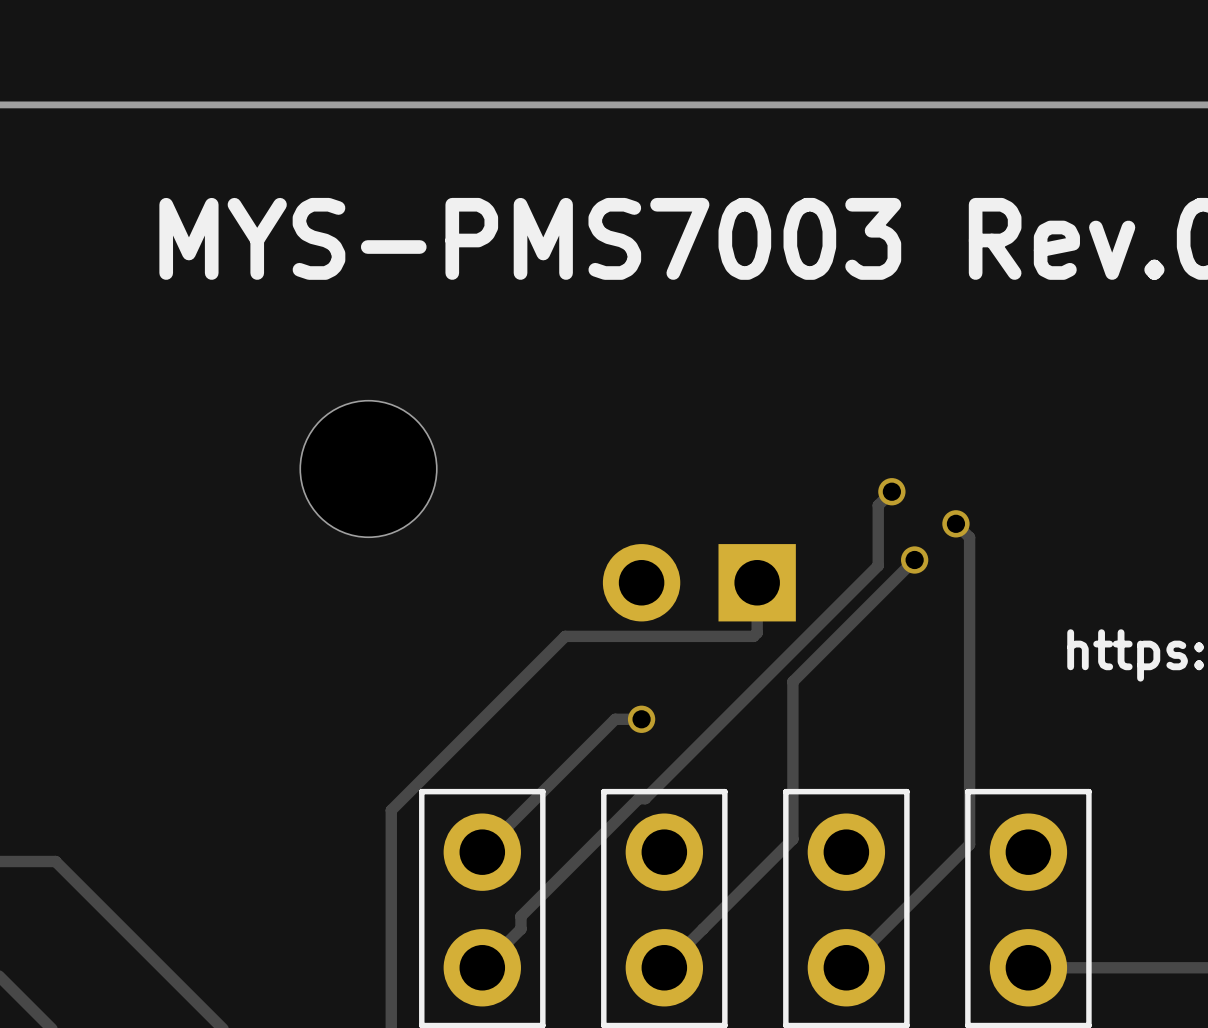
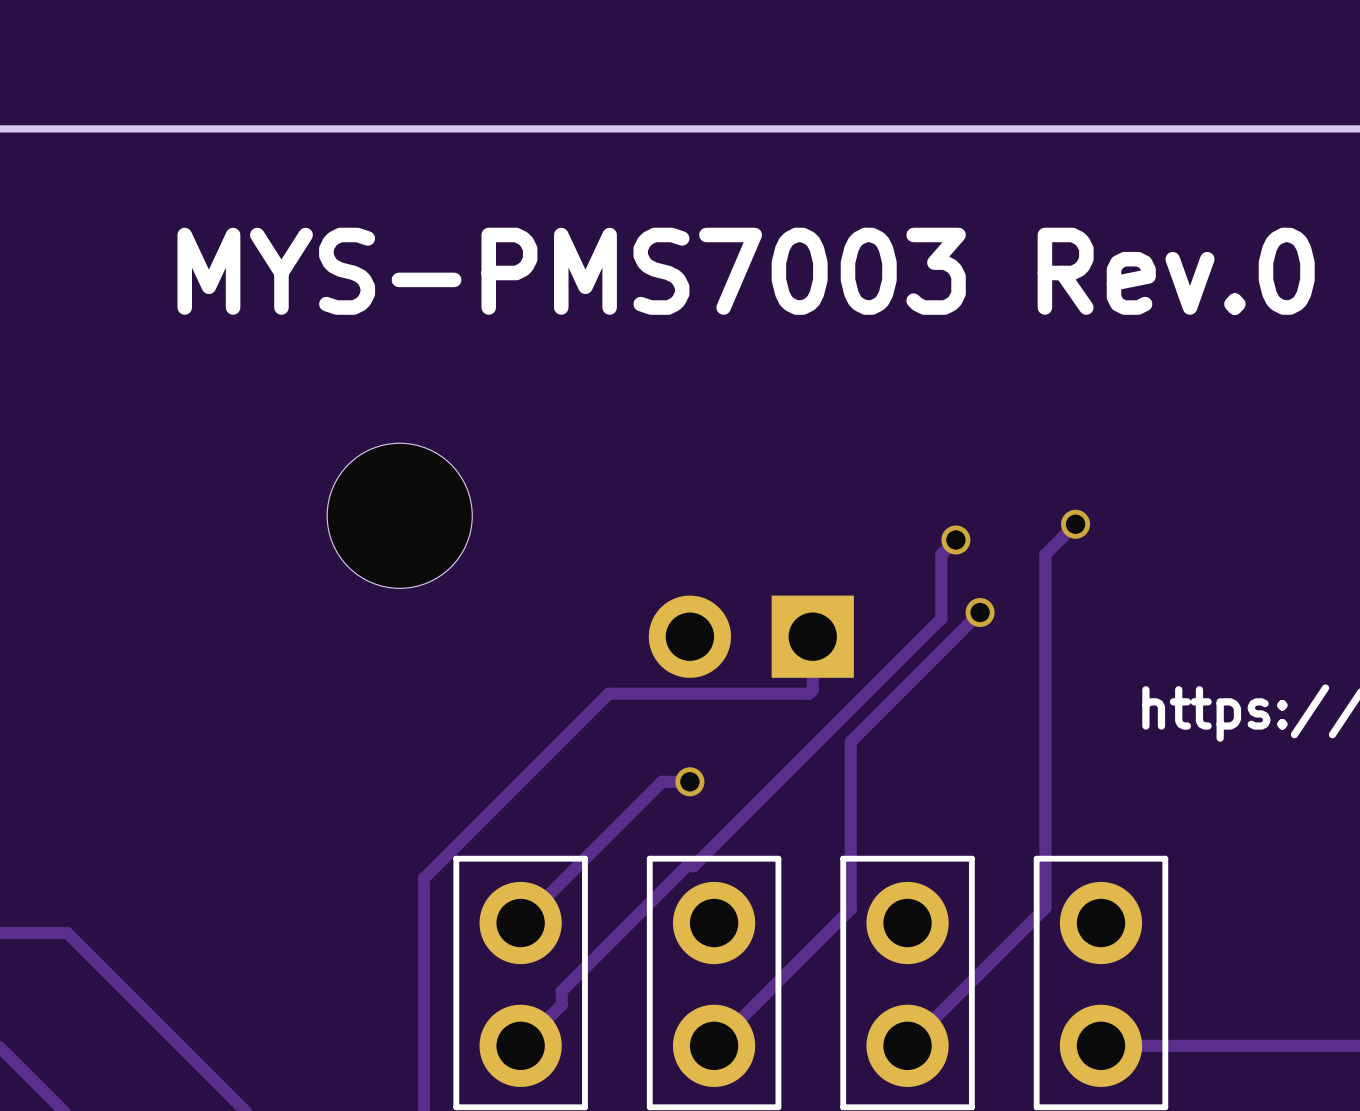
track: (955, 523) (969, 537) (969, 844) -> (1075, 524) (1045, 554) (1045, 907) (1038, 914)
via position: (955, 523) -> (1075, 524)

